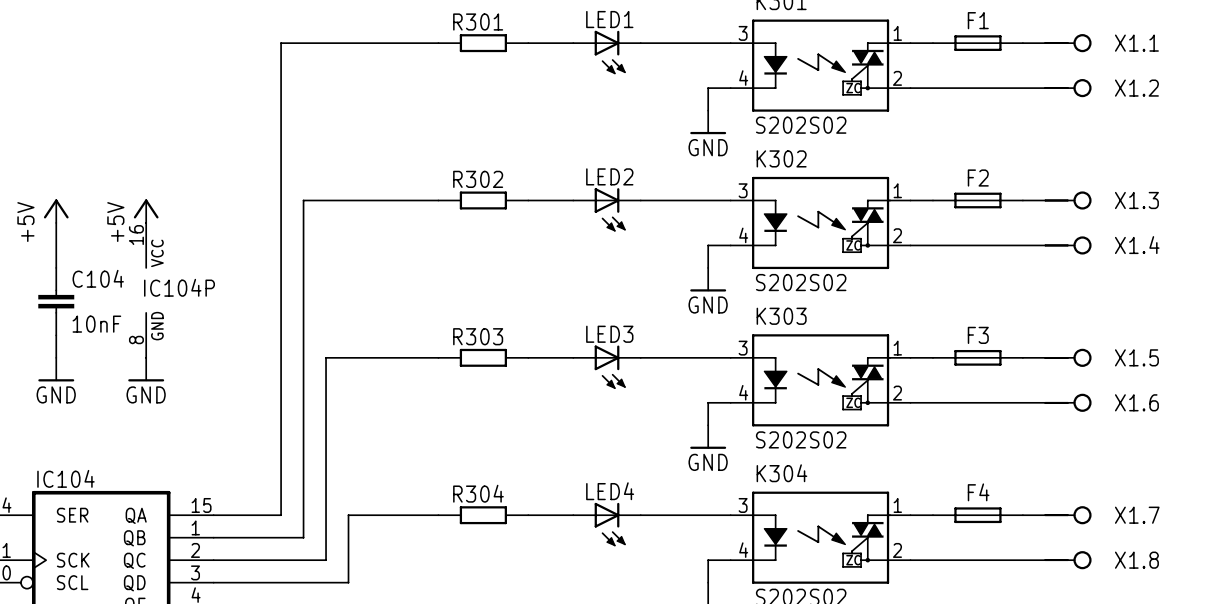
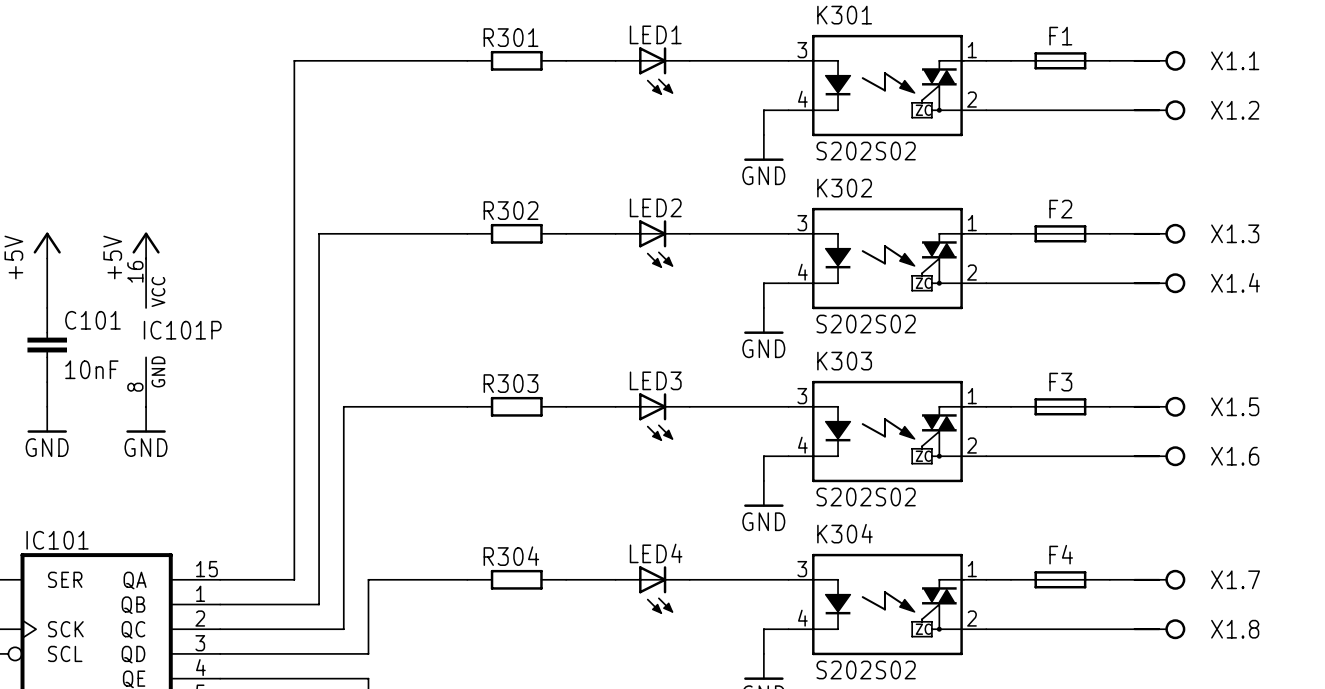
C104 name: C104 (98, 278) -> C101 (92, 320)
IC104P name: IC104P (179, 287) -> IC101P (182, 330)
IC104 name: IC104 (65, 478) -> IC101 (57, 540)

